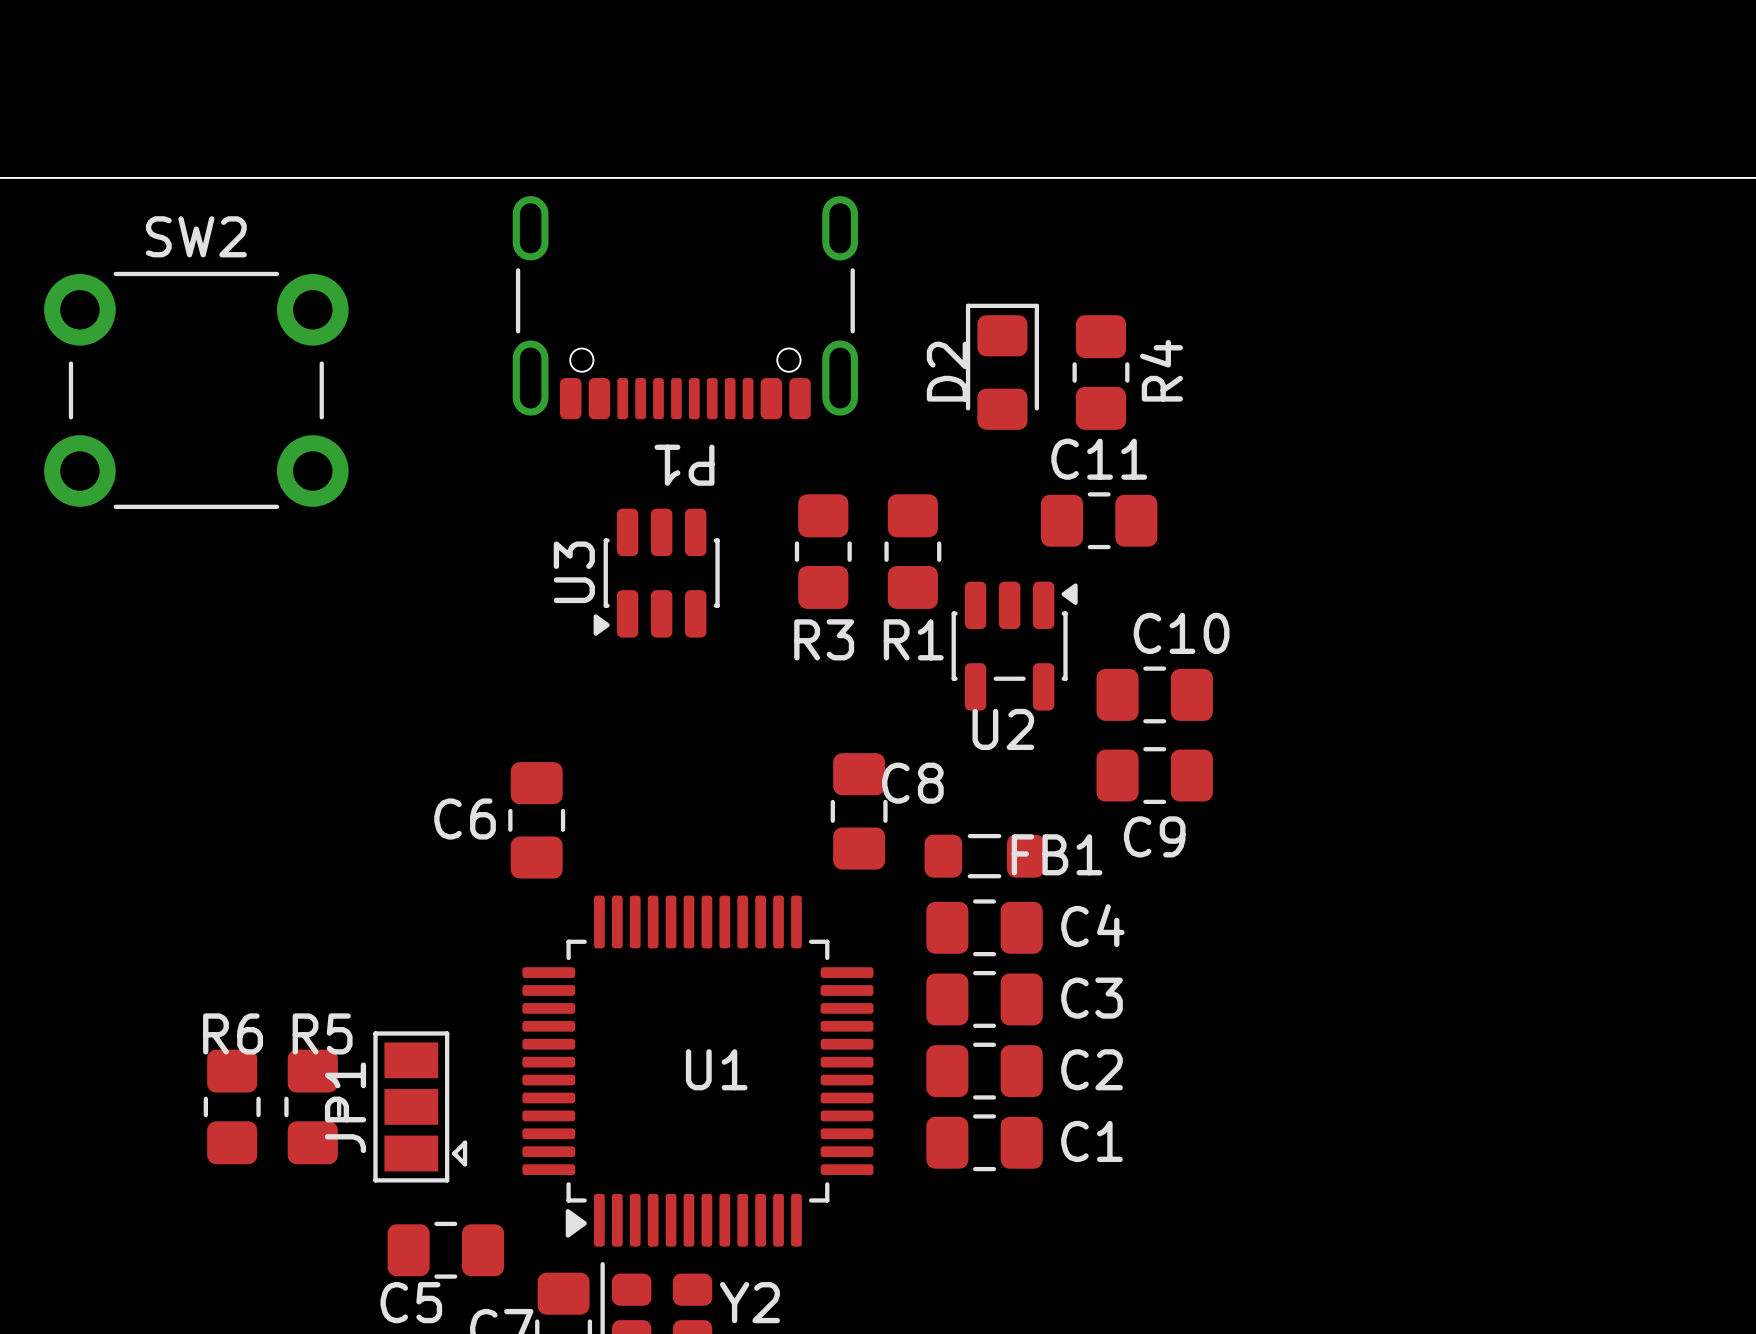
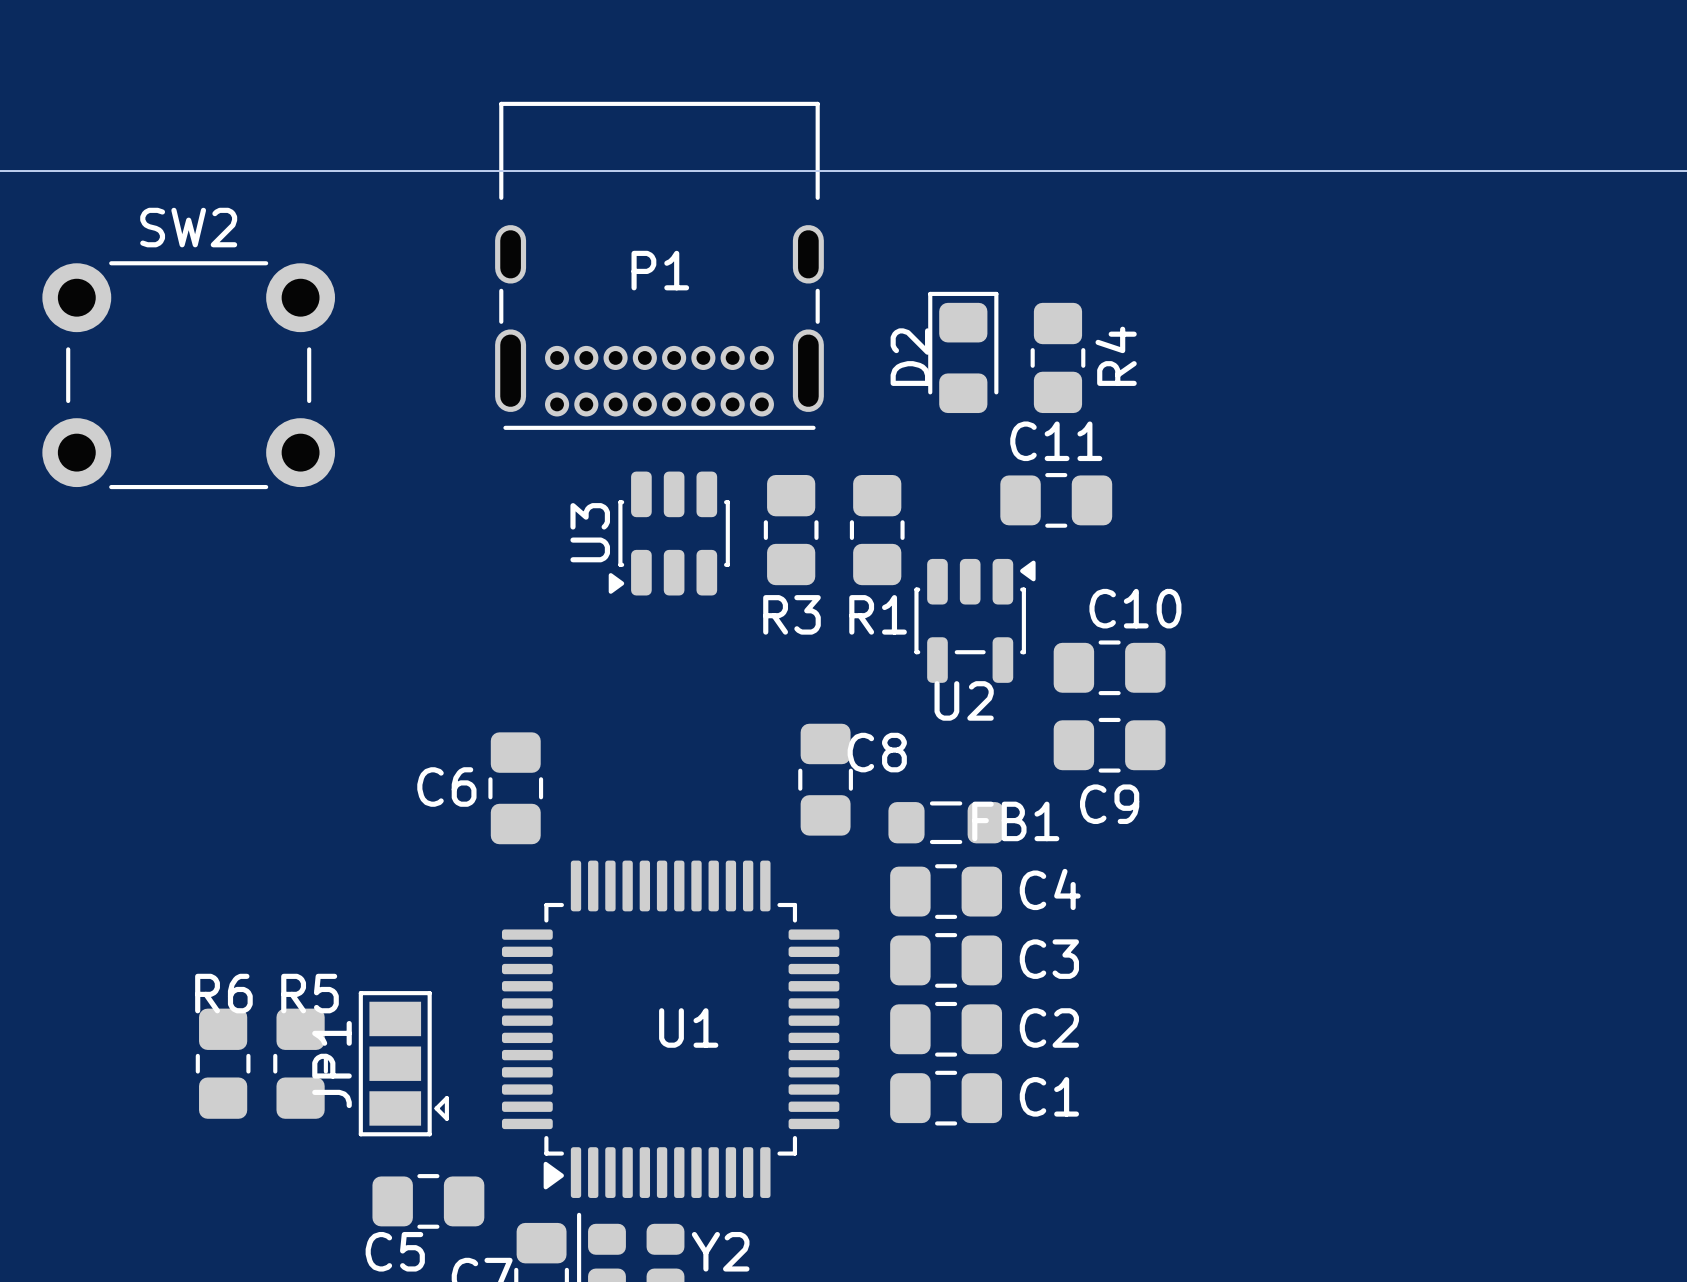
P1 footprint: [512, 196, 859, 420] -> [495, 101, 824, 430]
P1 name position: P1 (684, 465) -> P1 (660, 270)
U3 position: (656, 573) -> (669, 533)

